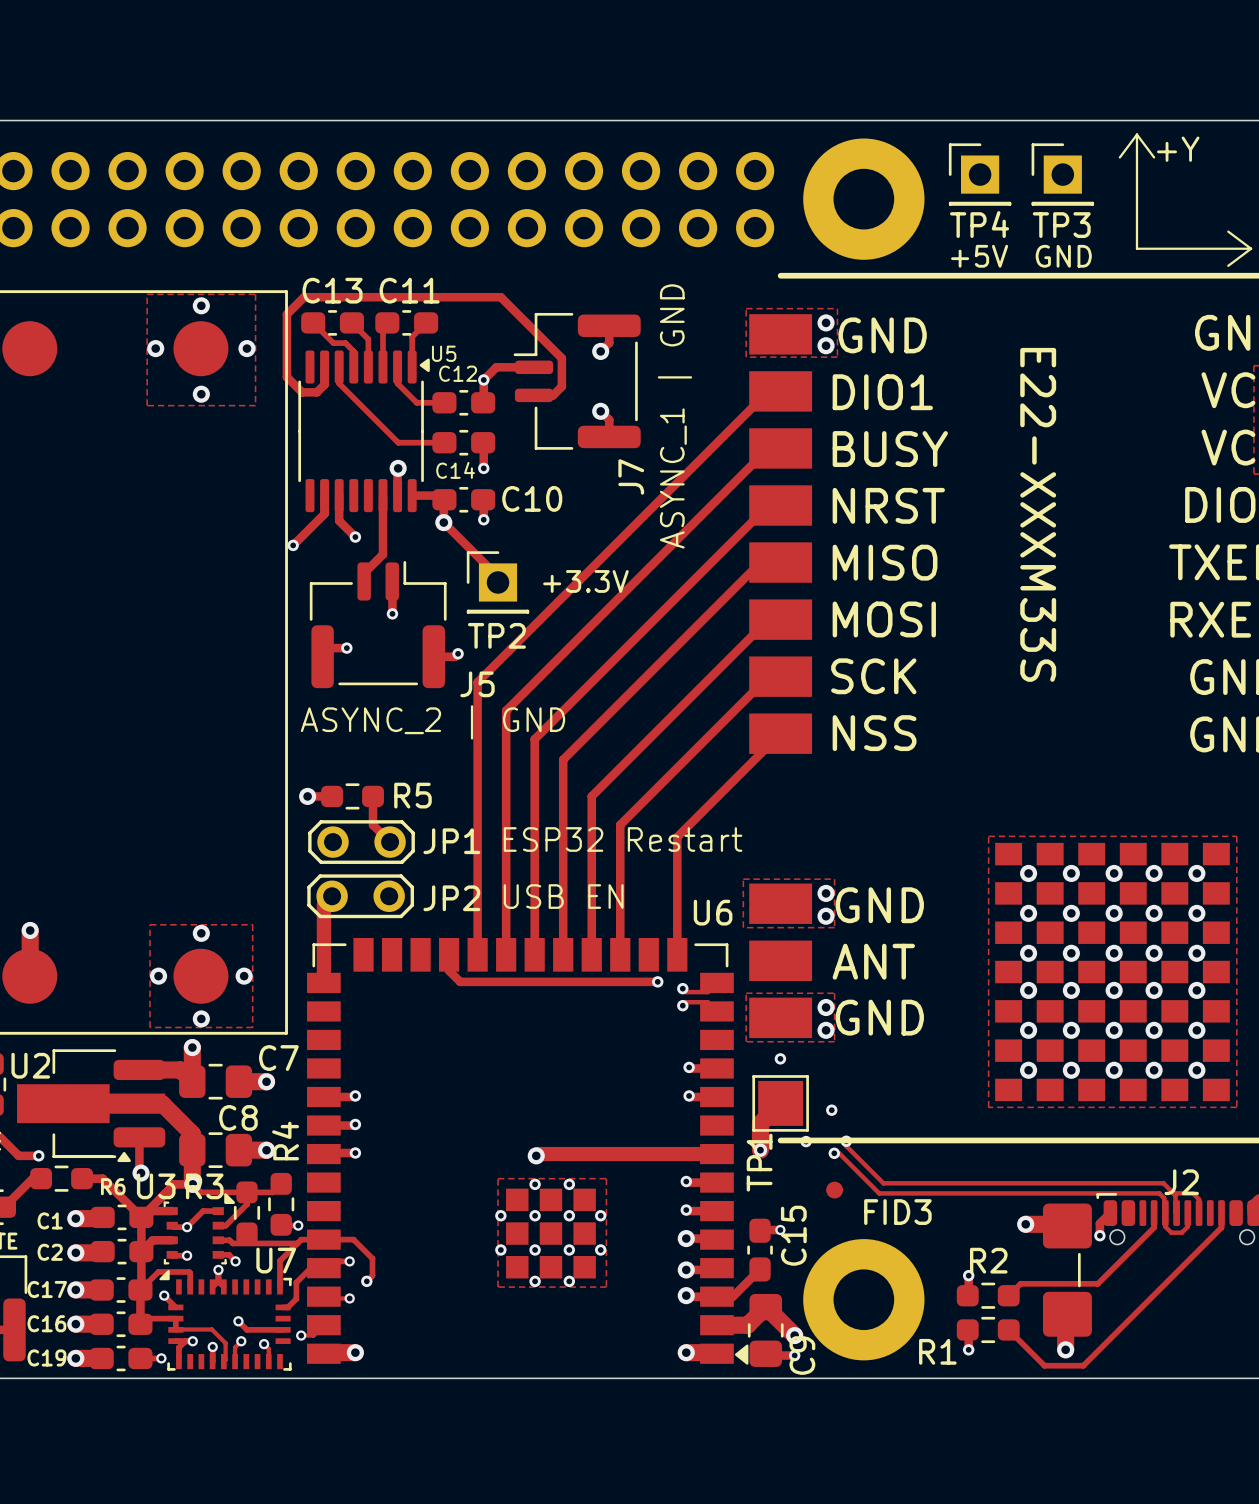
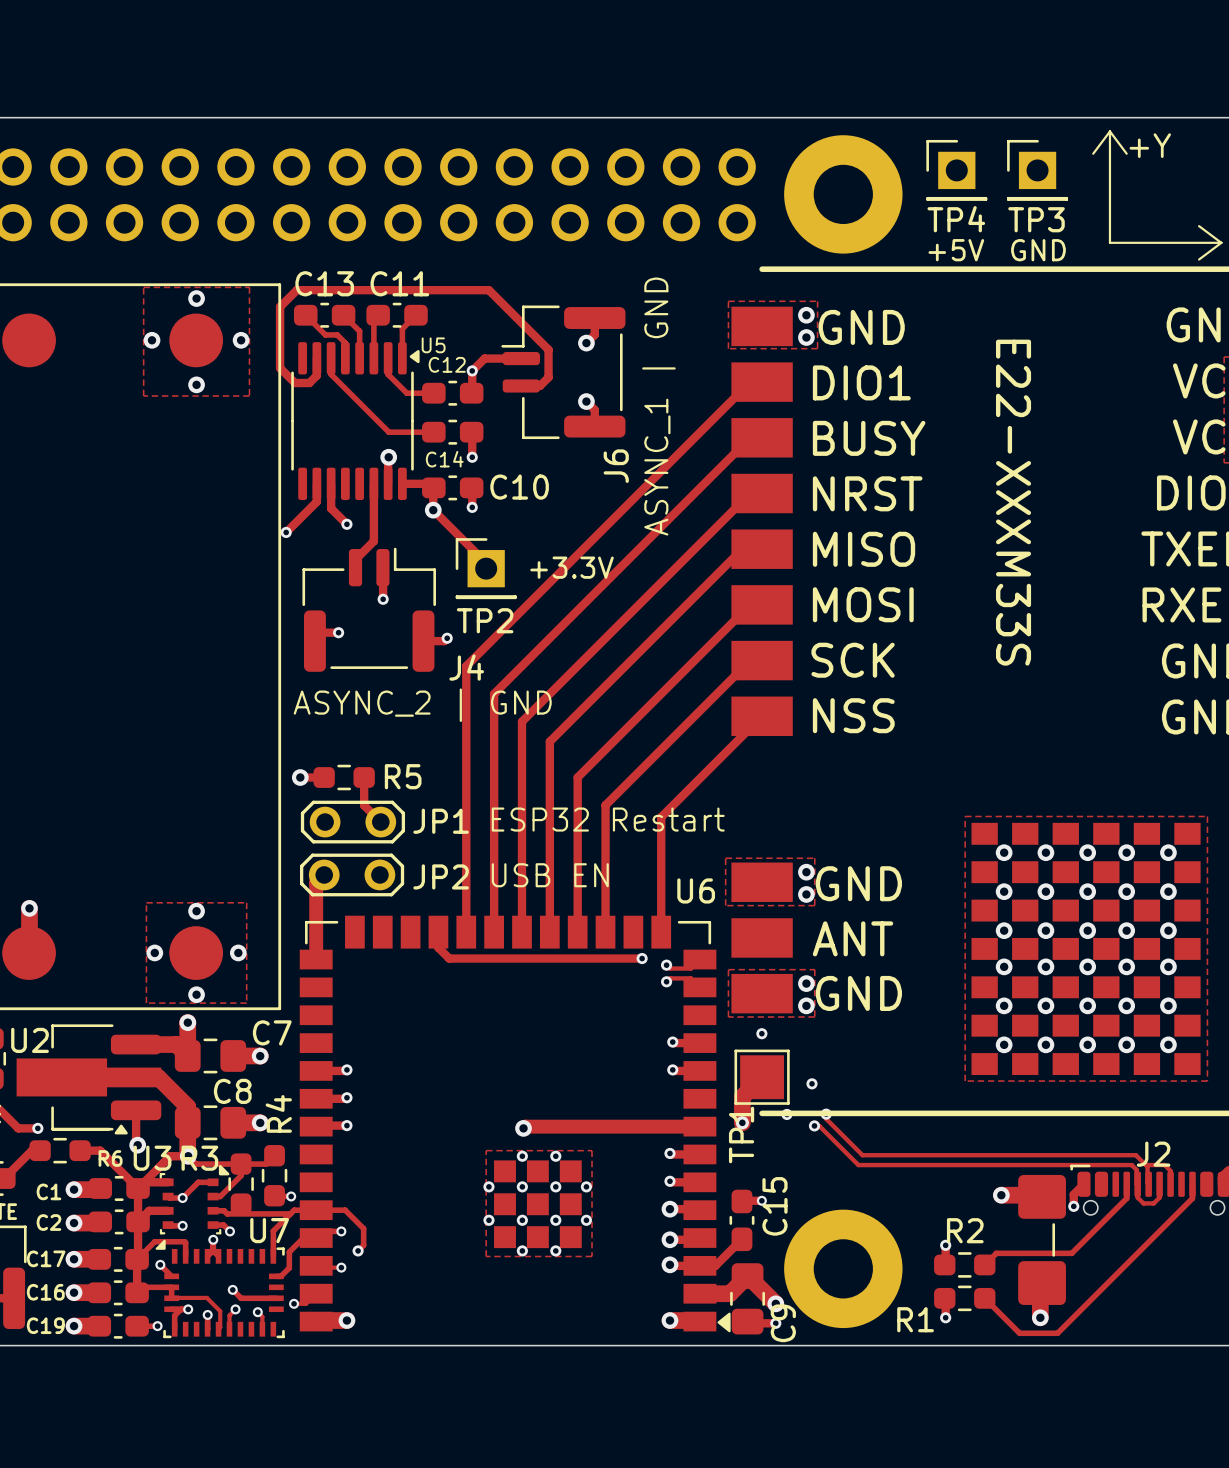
J7 name: J7 (631, 476) -> J6 (616, 466)
J5 name: J5 (477, 684) -> J4 (466, 667)
FID3: (834, 1190) -> none

